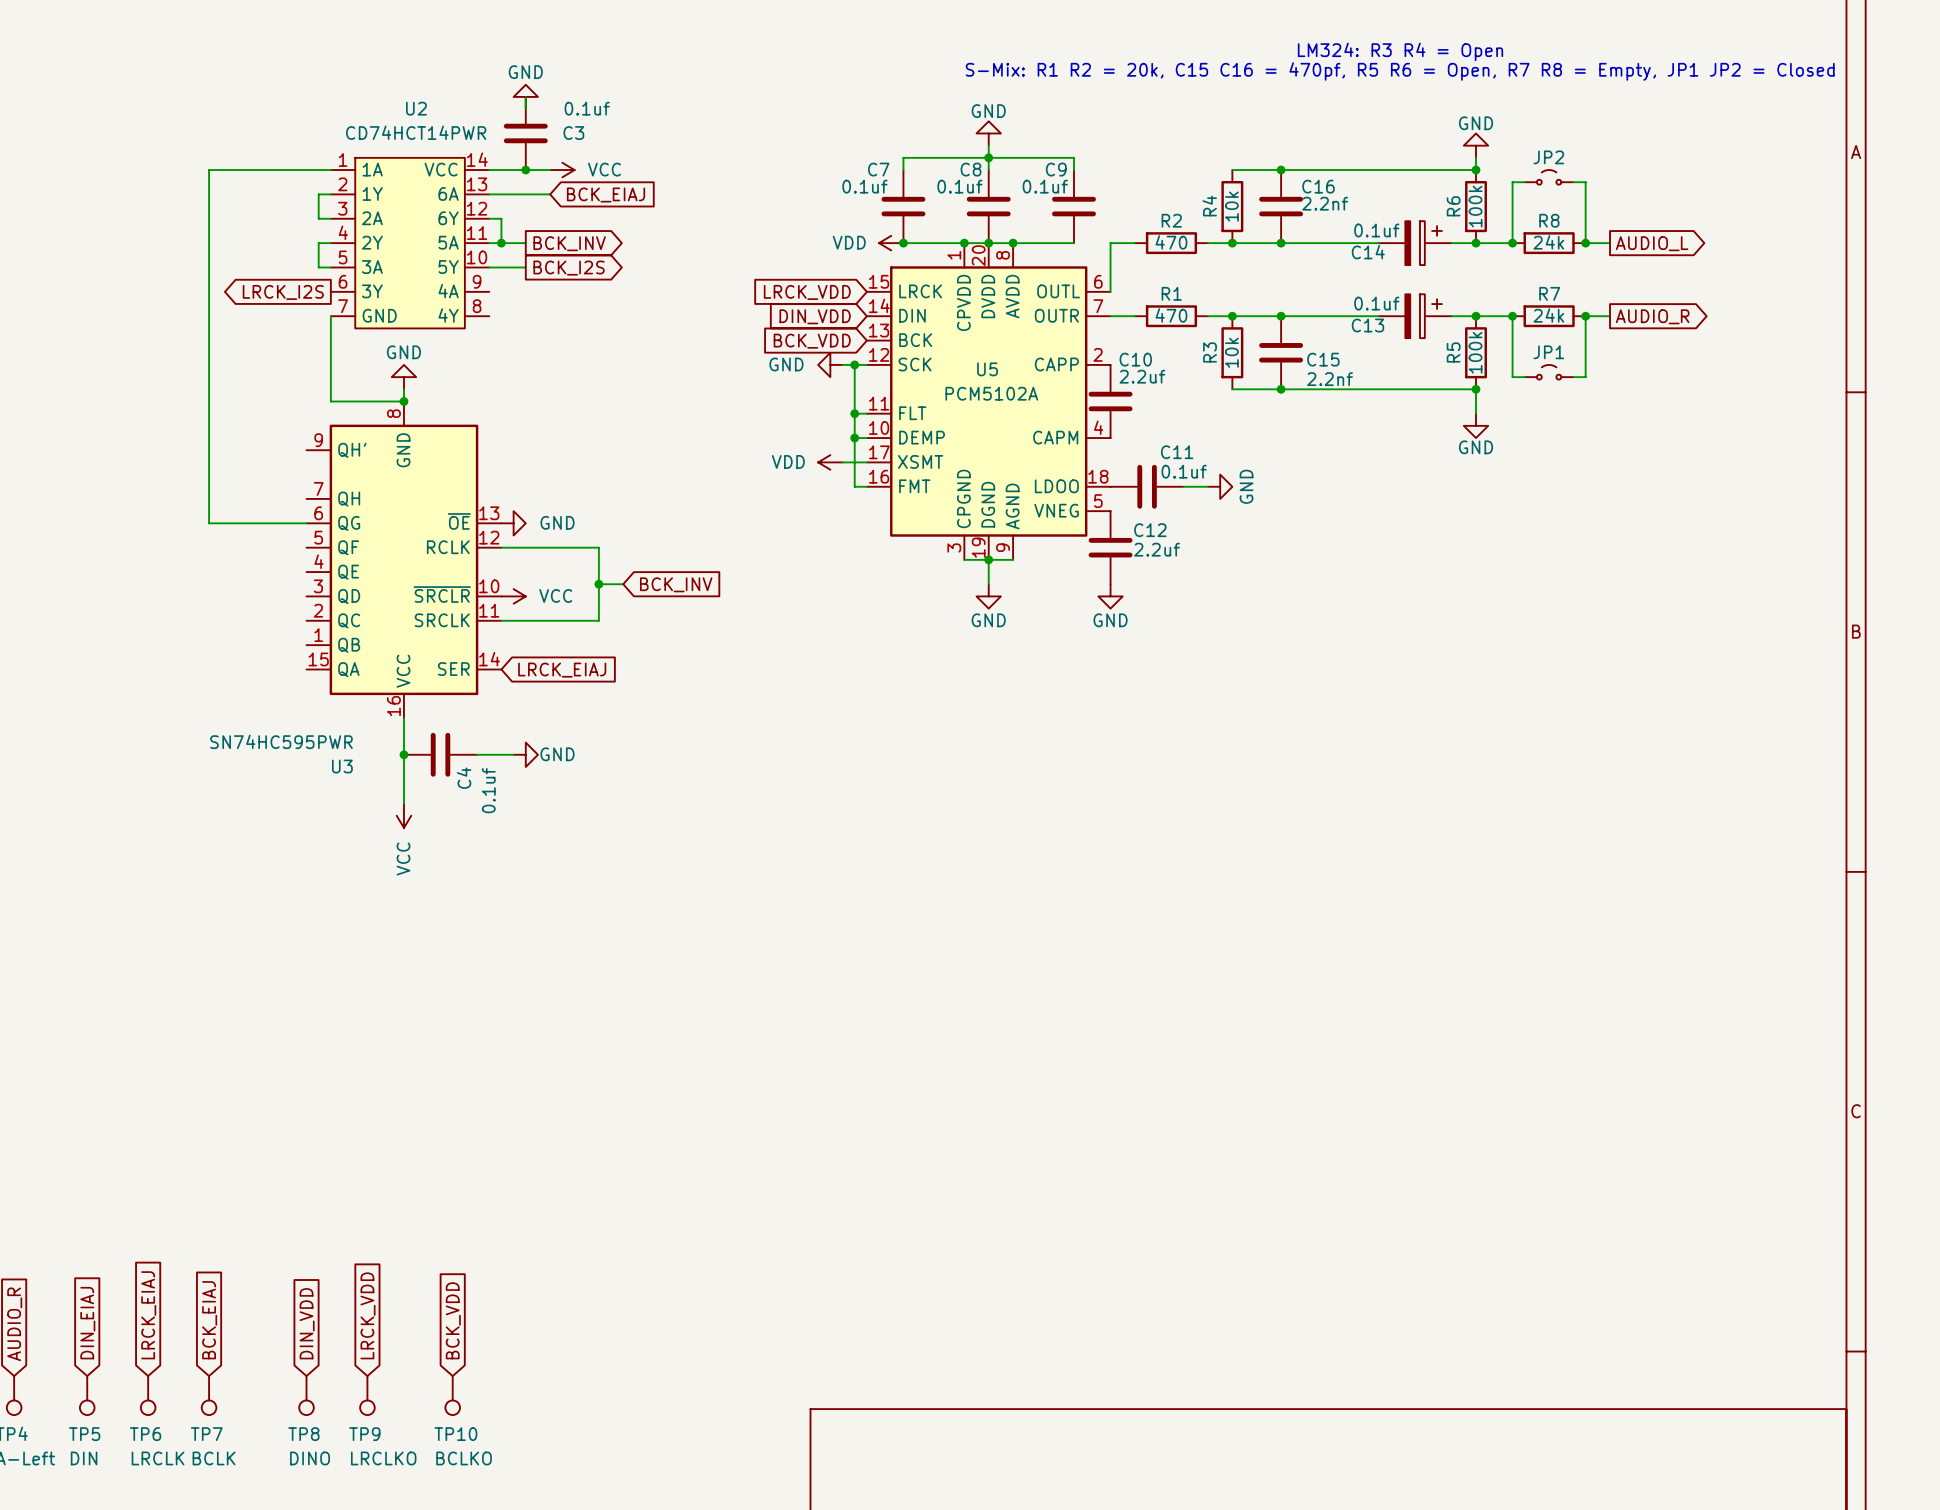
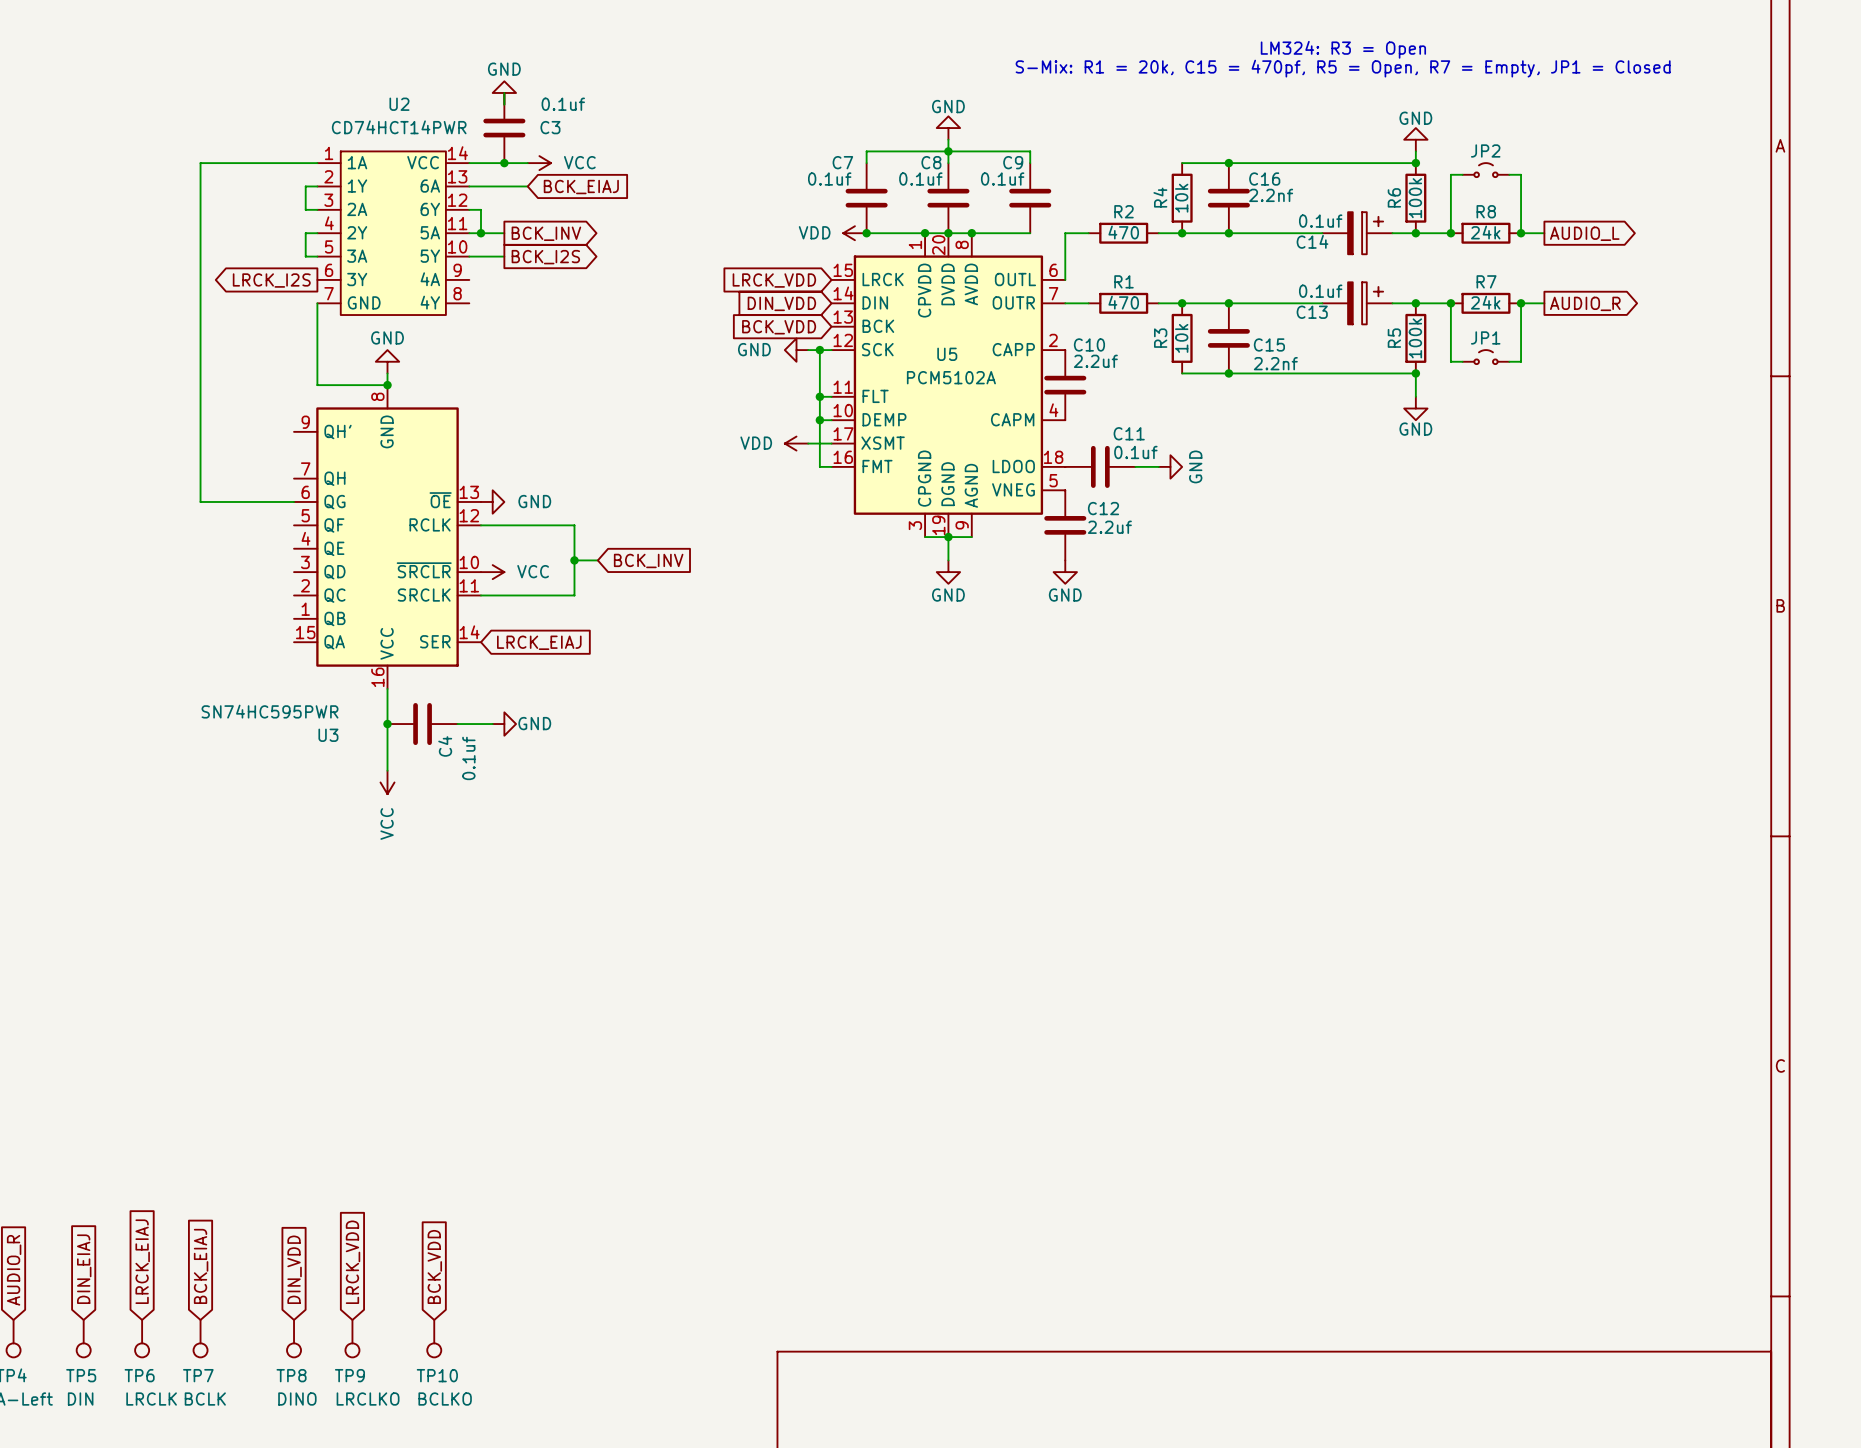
text: LM324: R3 R4 = Open (1400, 51) -> LM324: R3 = Open (1343, 49)
text: S-Mix: R1 R2 = 20k, C15 C16 = 470pf, R5 R6 = Open, R7 R8 = Empty, JP1 JP2 = Closed (1400, 71) -> S-Mix: R1 = 20k, C15 = 470pf, R5 = Open, R7 = Empty, JP1 = Closed (1343, 68)

